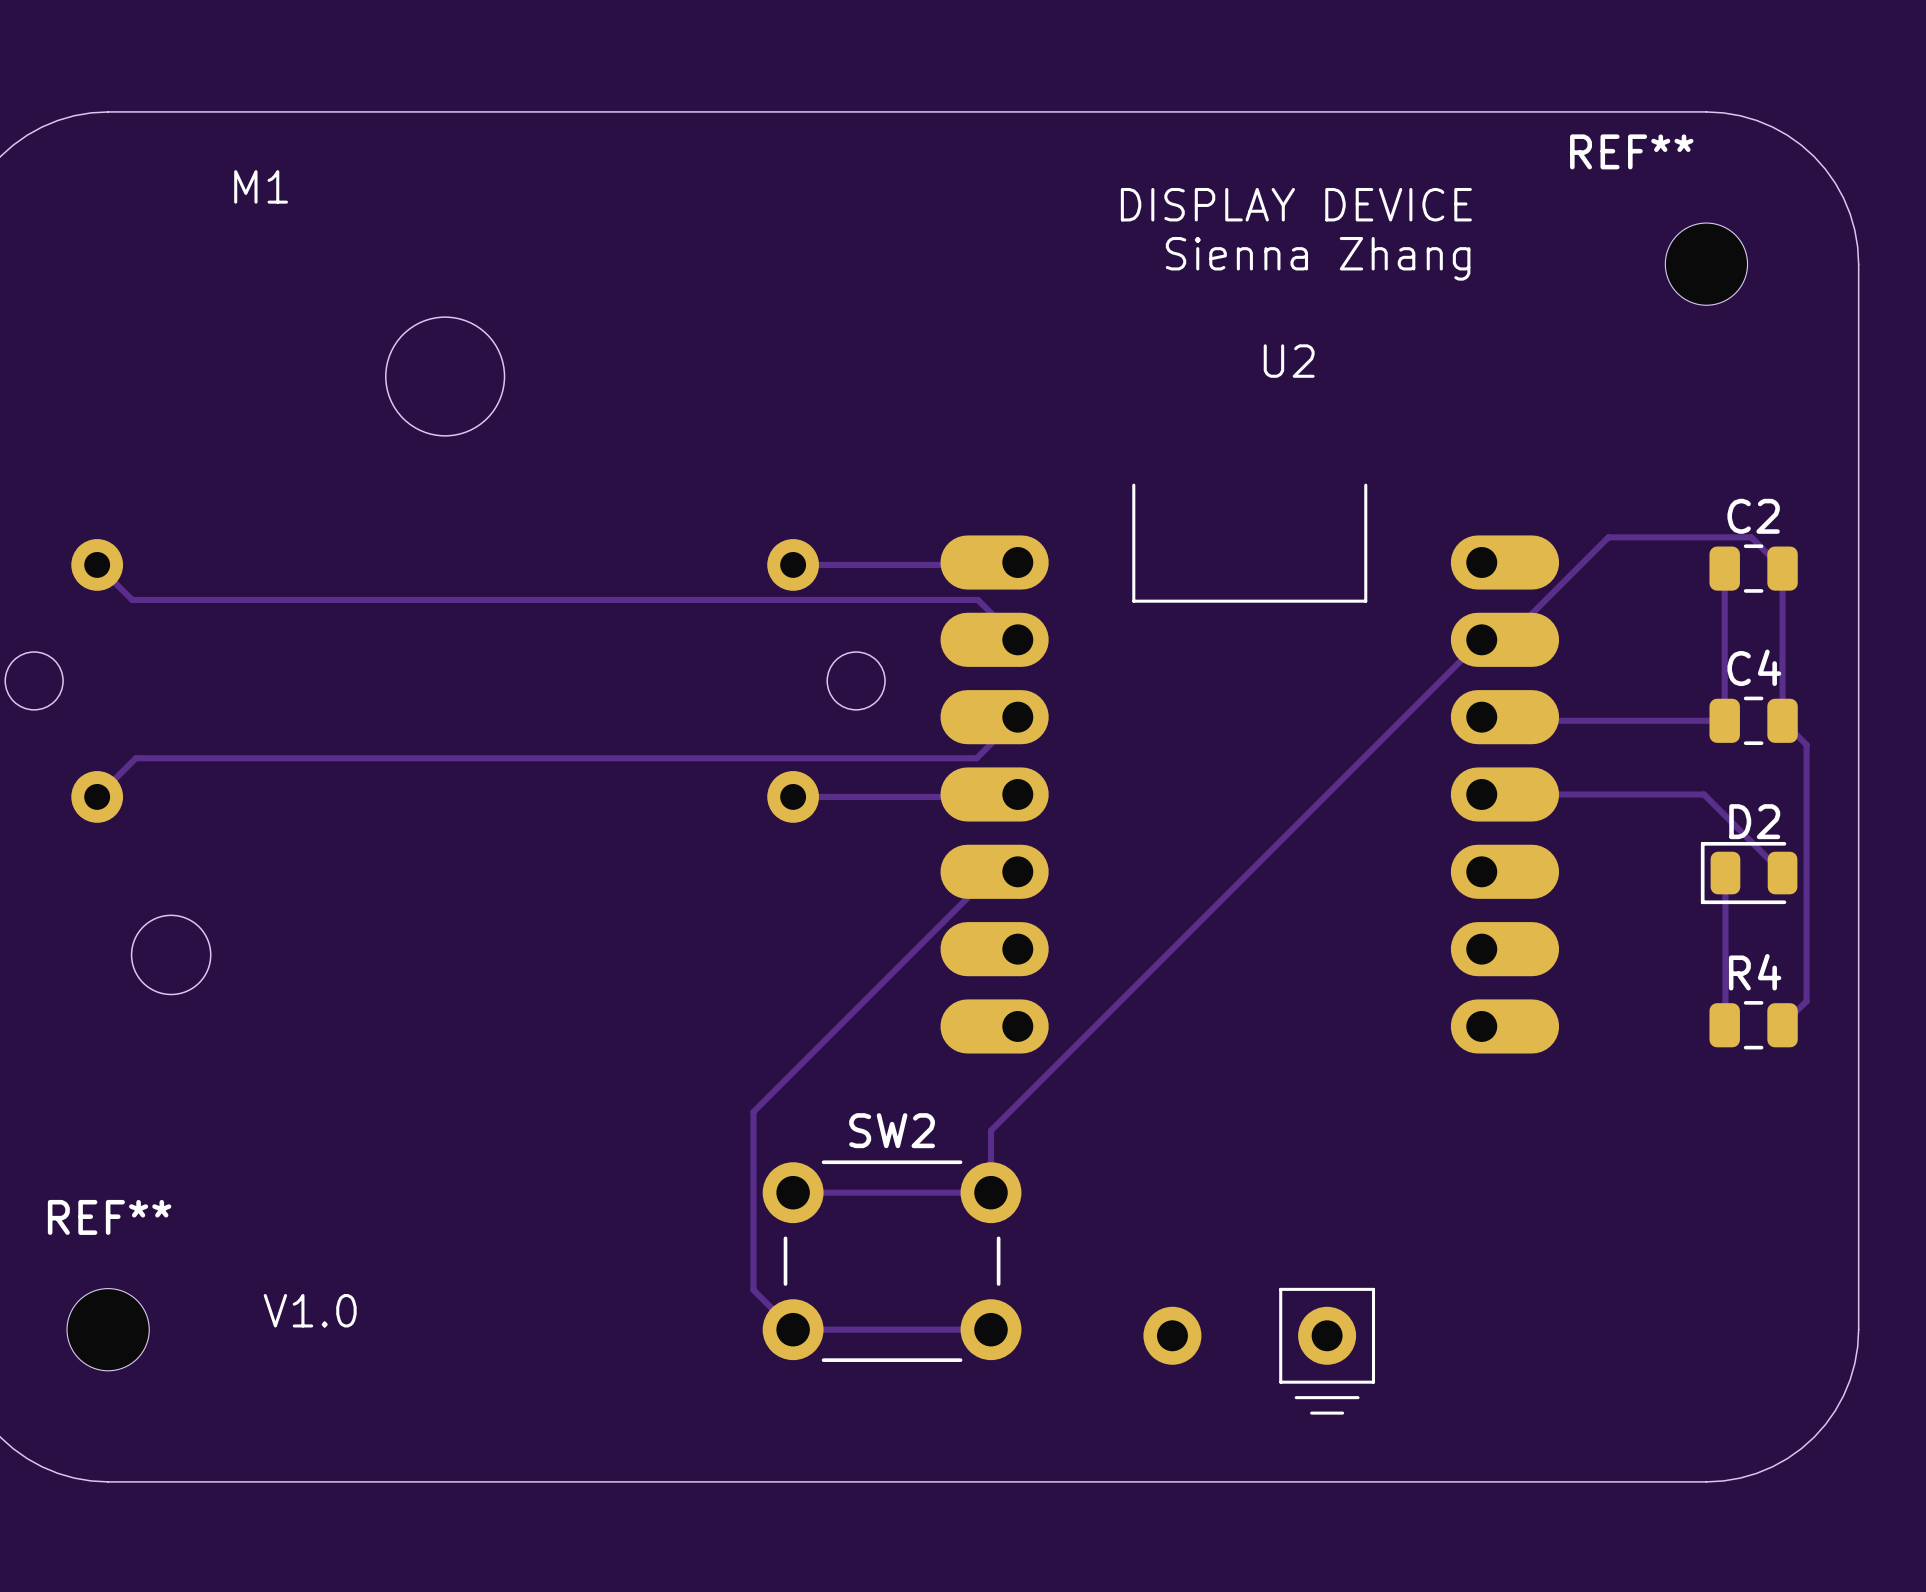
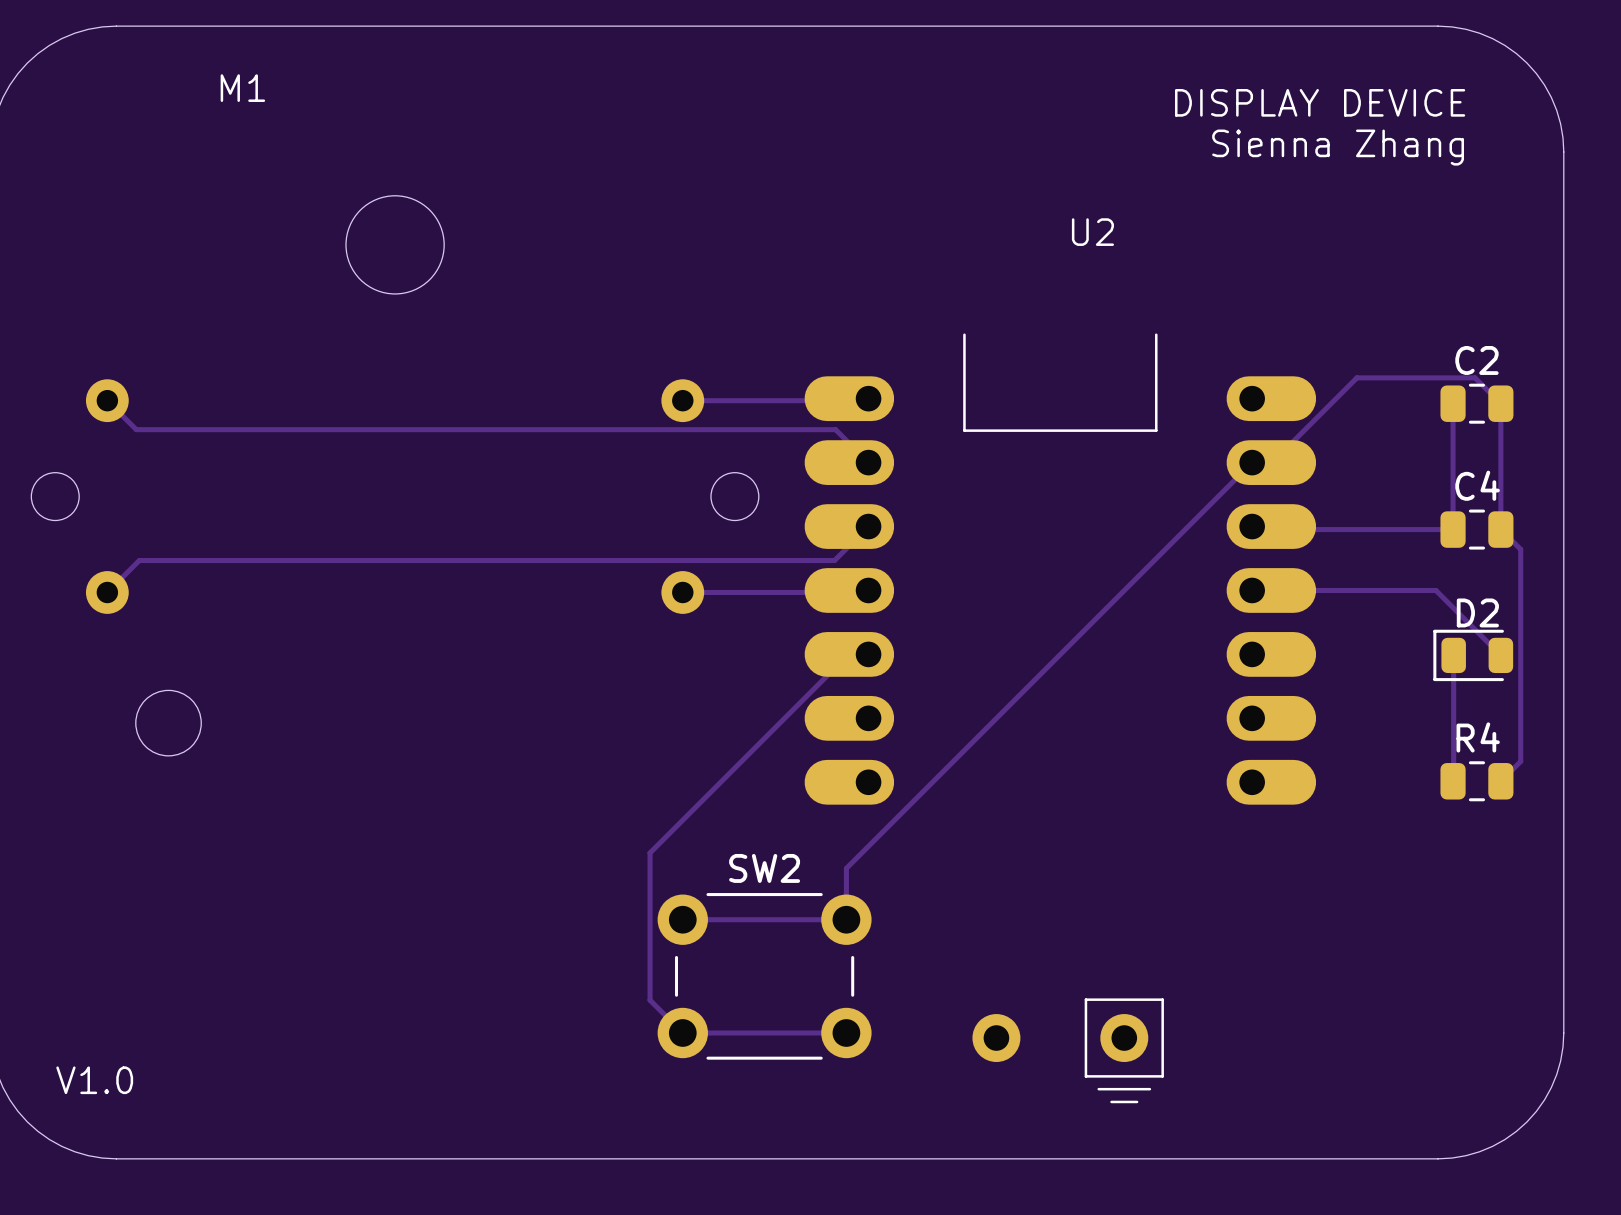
text position: DISPLAY DEVICE (1296, 204) -> DISPLAY DEVICE (1320, 102)
text position: Sienna Zhang (1318, 258) -> Sienna Zhang (1338, 147)
REF**: (1706, 264) -> none
text position: V1.0 (310, 1310) -> V1.0 (94, 1080)
REF**: (108, 1329) -> none

